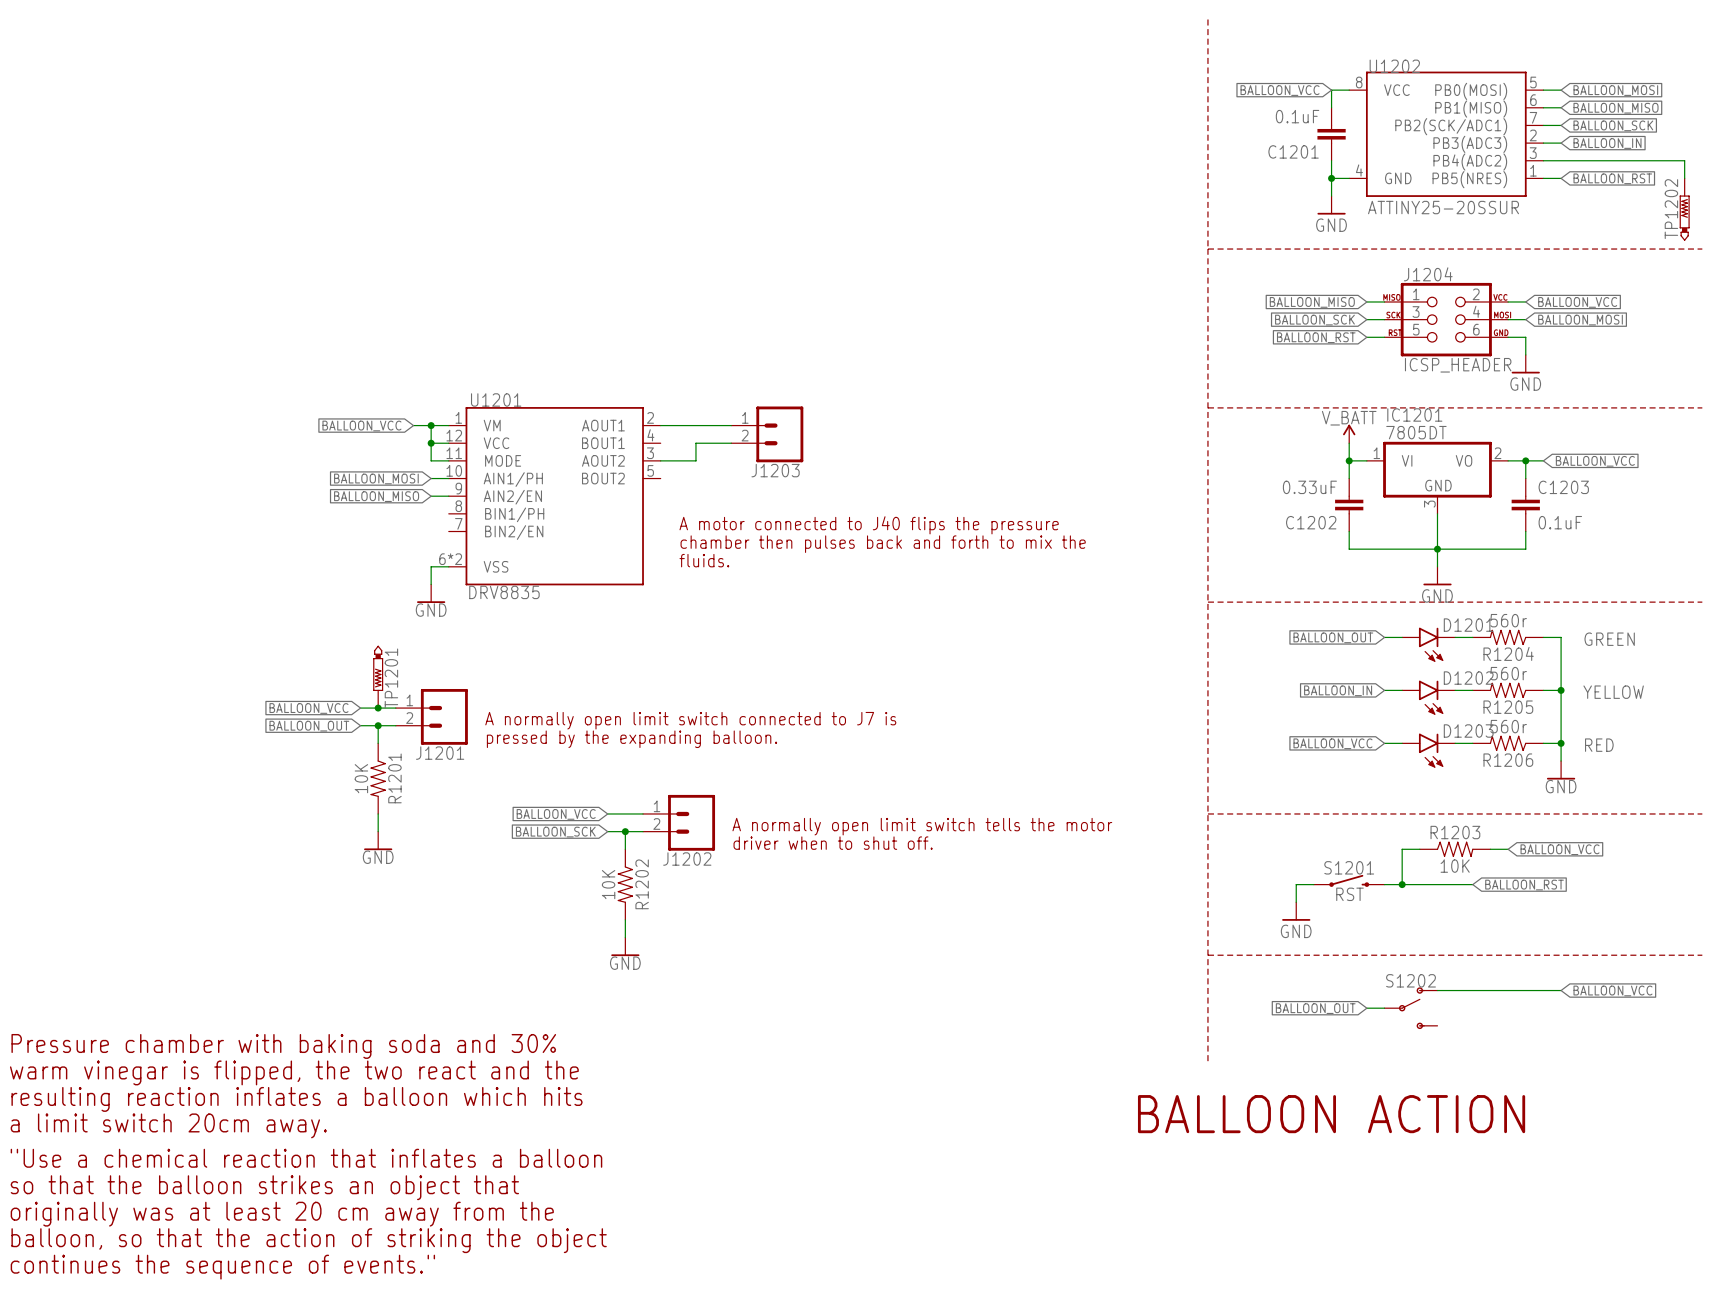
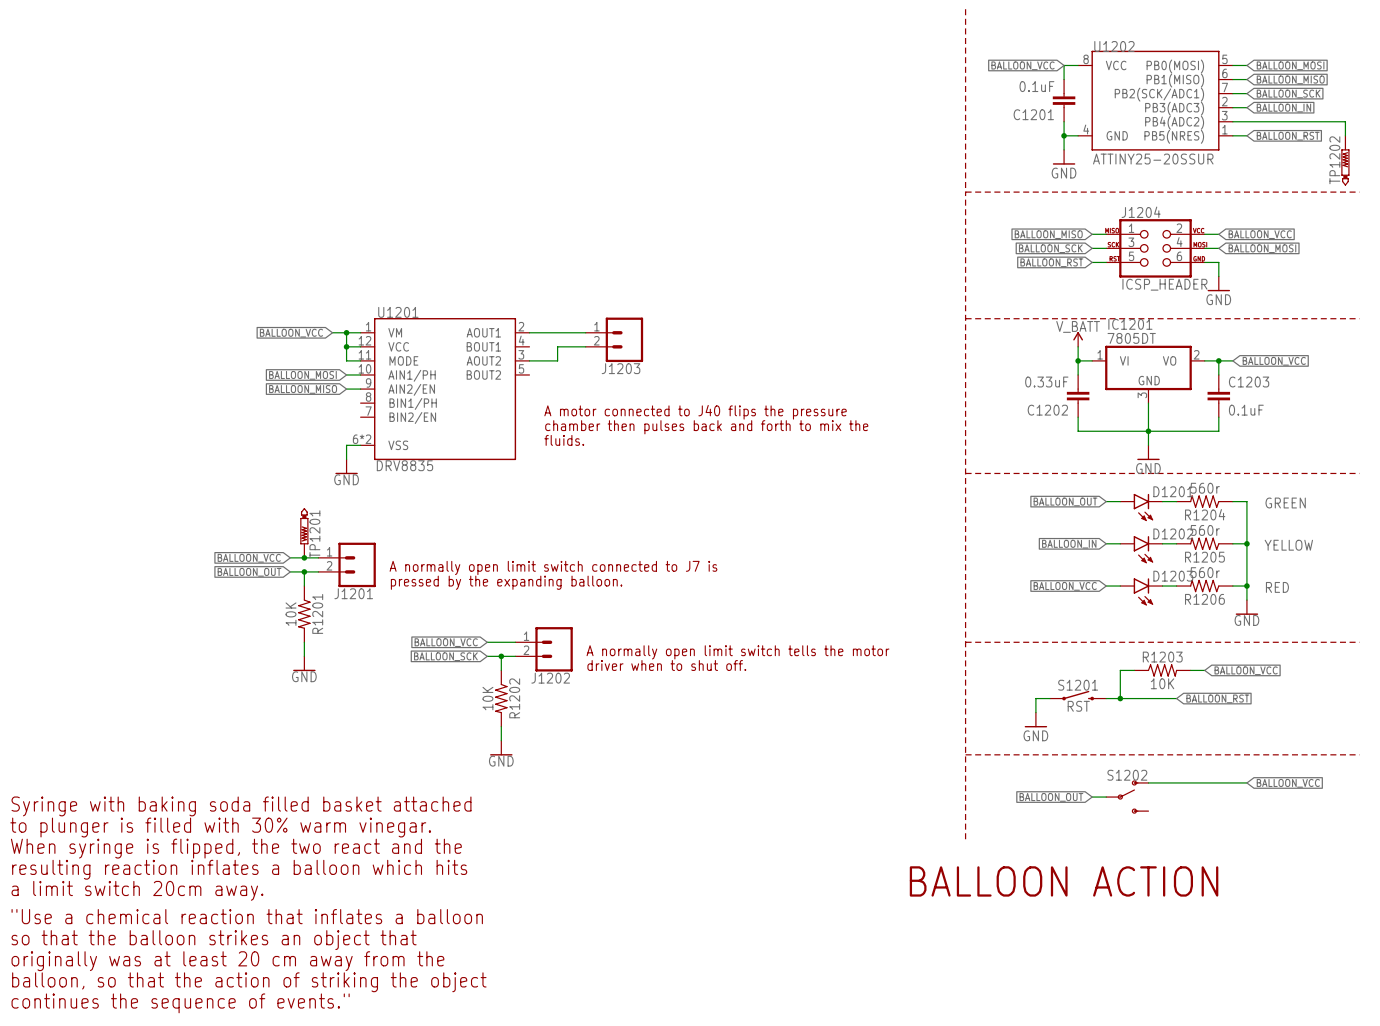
text: none -> Syringe with baking soda filled basket attached (241, 806)
text: Pressure chamber with baking soda and 30% (283, 1046) -> to plunger is filled with 30% warm vinegar. (220, 827)
text: warm vinegar is flipped, the two react and the (294, 1072) -> When syringe is flipped, the two react and the (236, 848)

